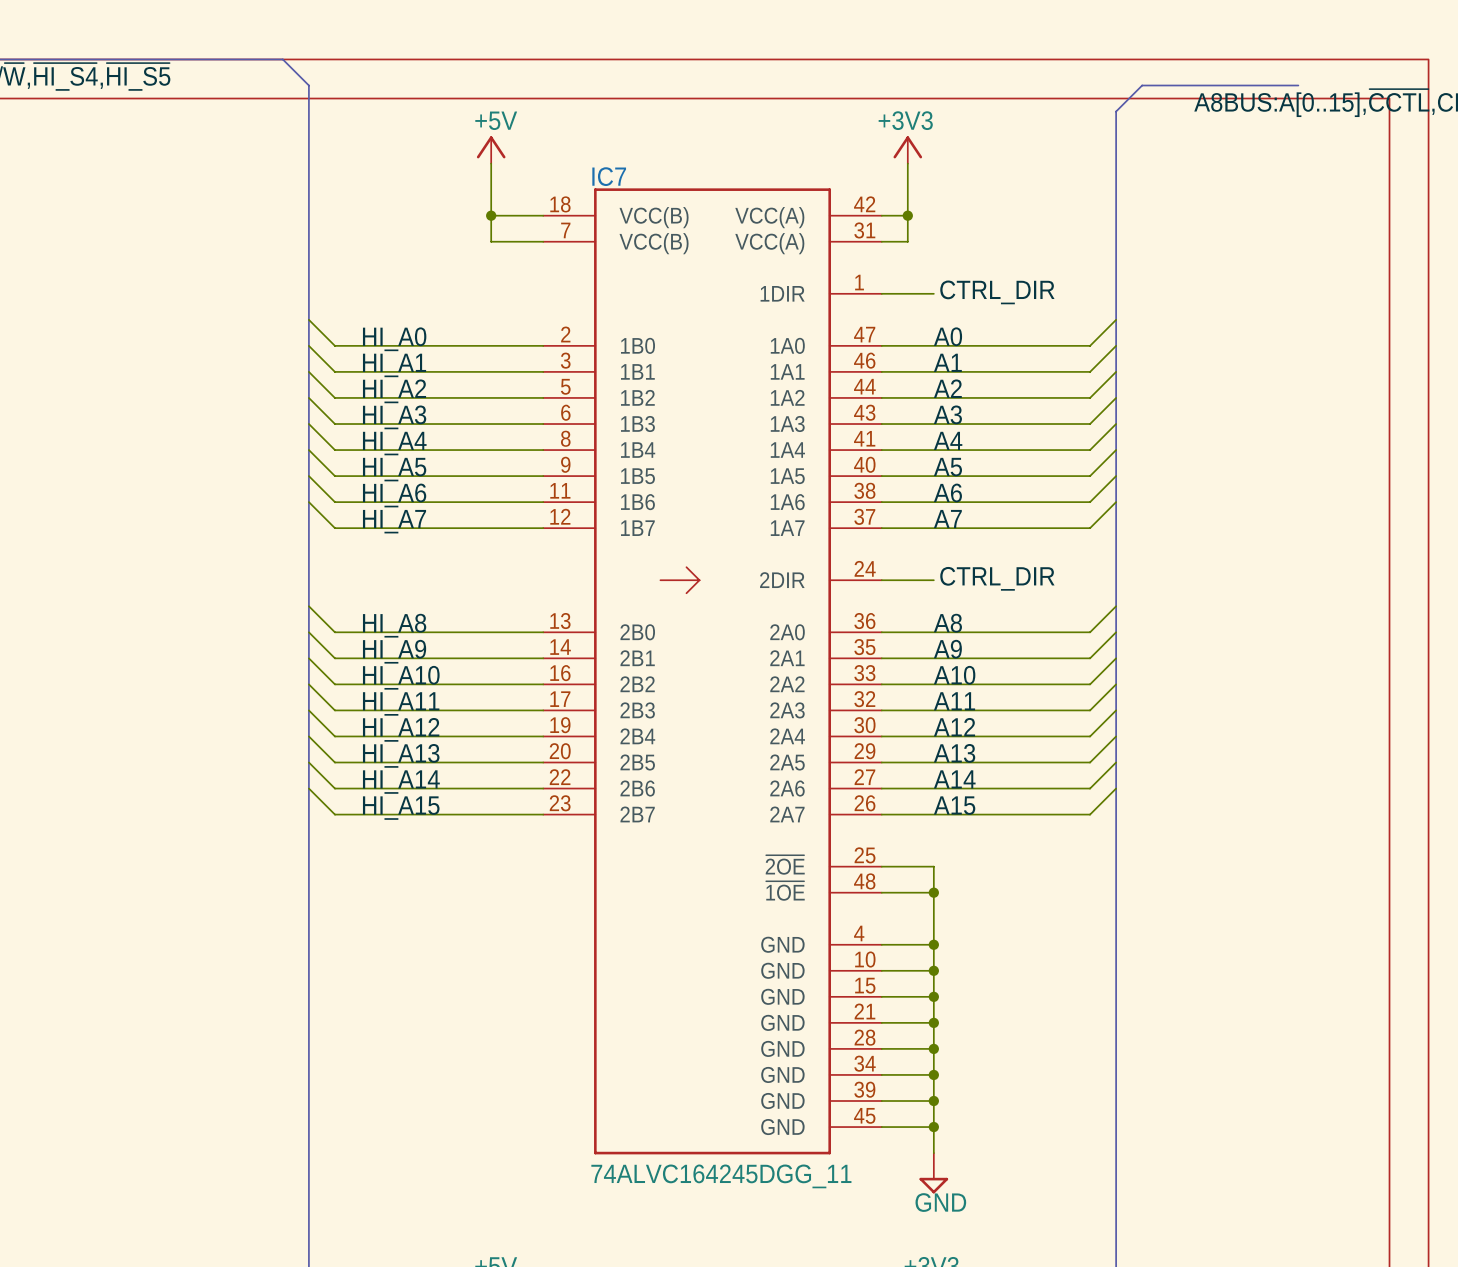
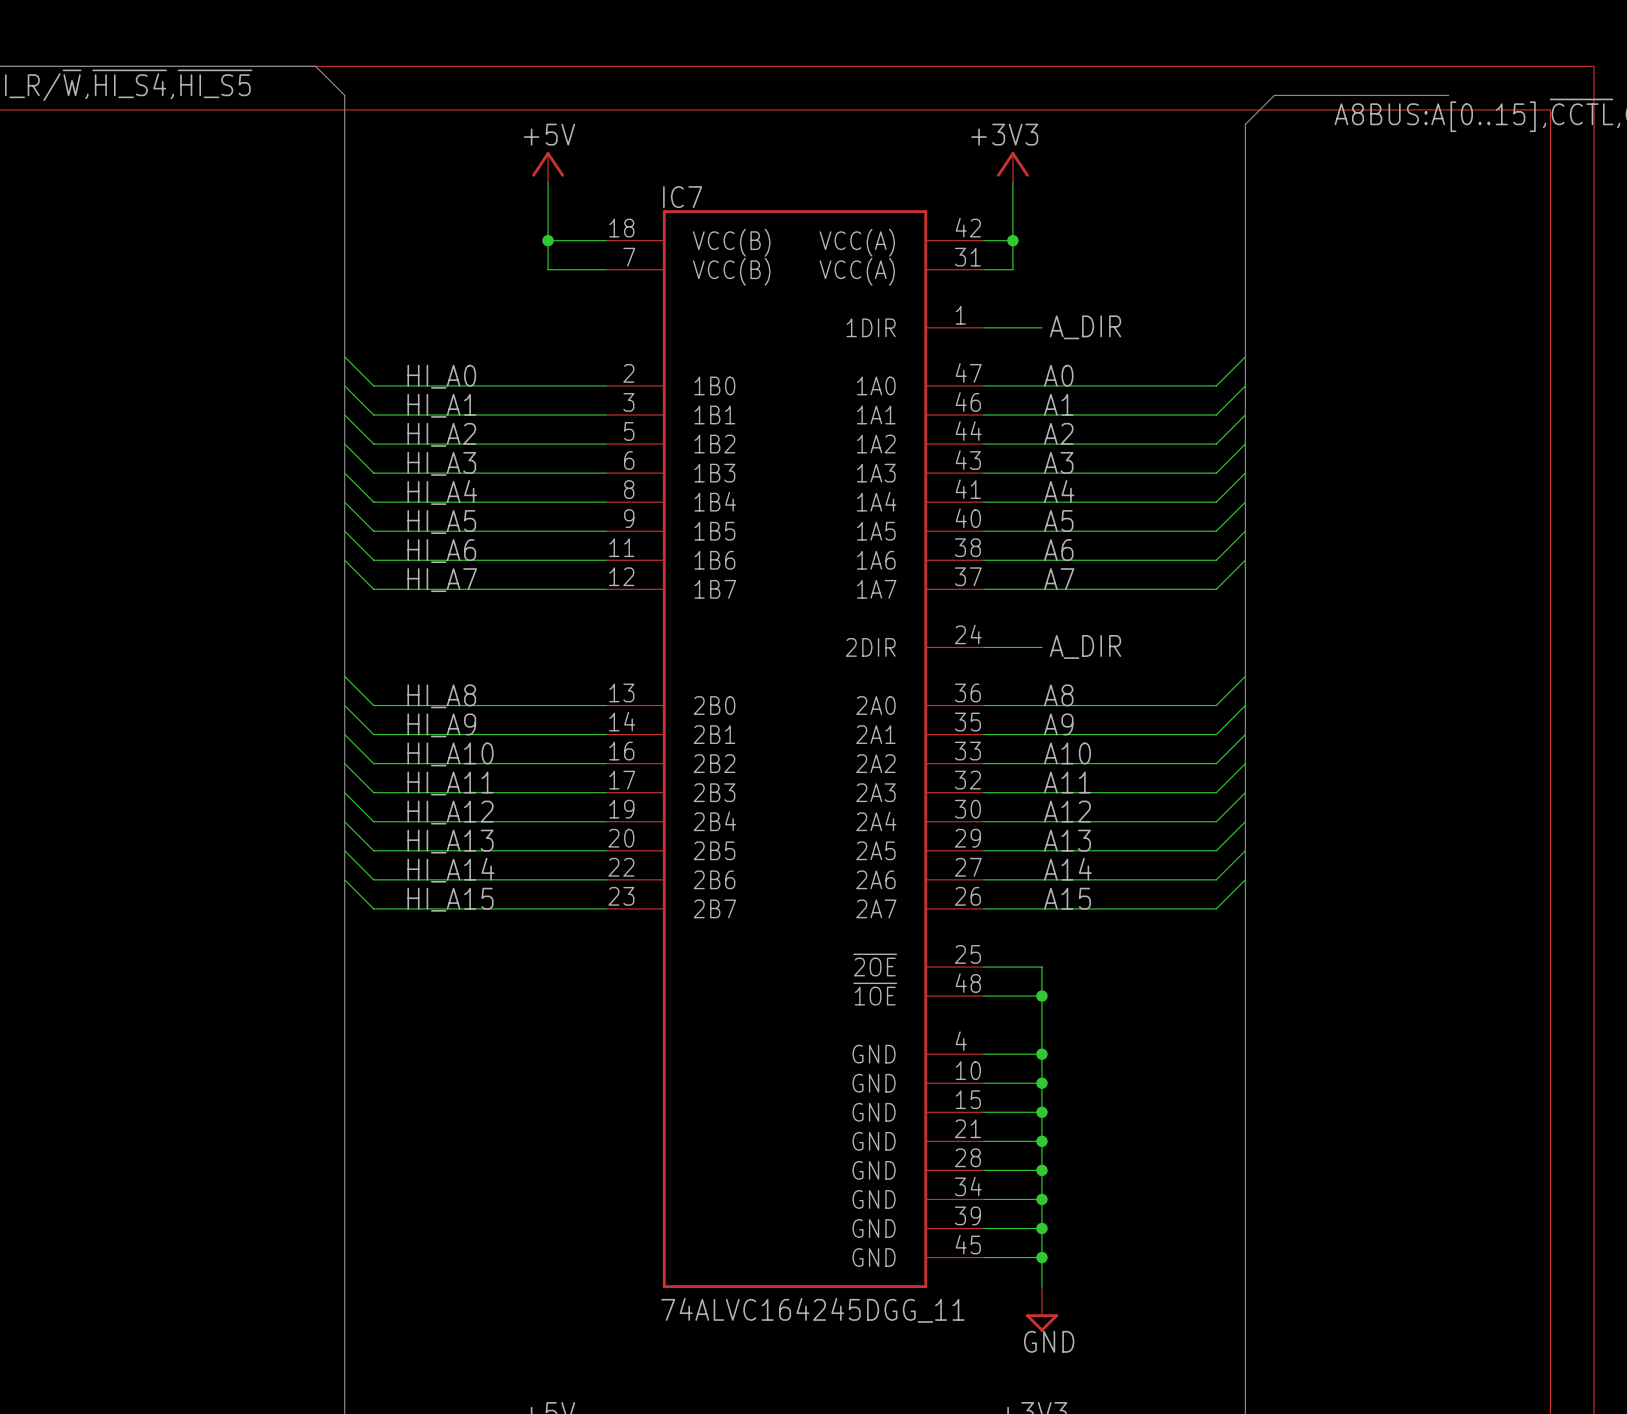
label: CTRL_DIR (997, 292) -> A_DIR (1085, 327)
line: (686, 567) (699, 580) -> none
label: CTRL_DIR (997, 578) -> A_DIR (1085, 646)
line: (660, 580) (699, 580) -> none
line: (699, 580) (686, 593) -> none

